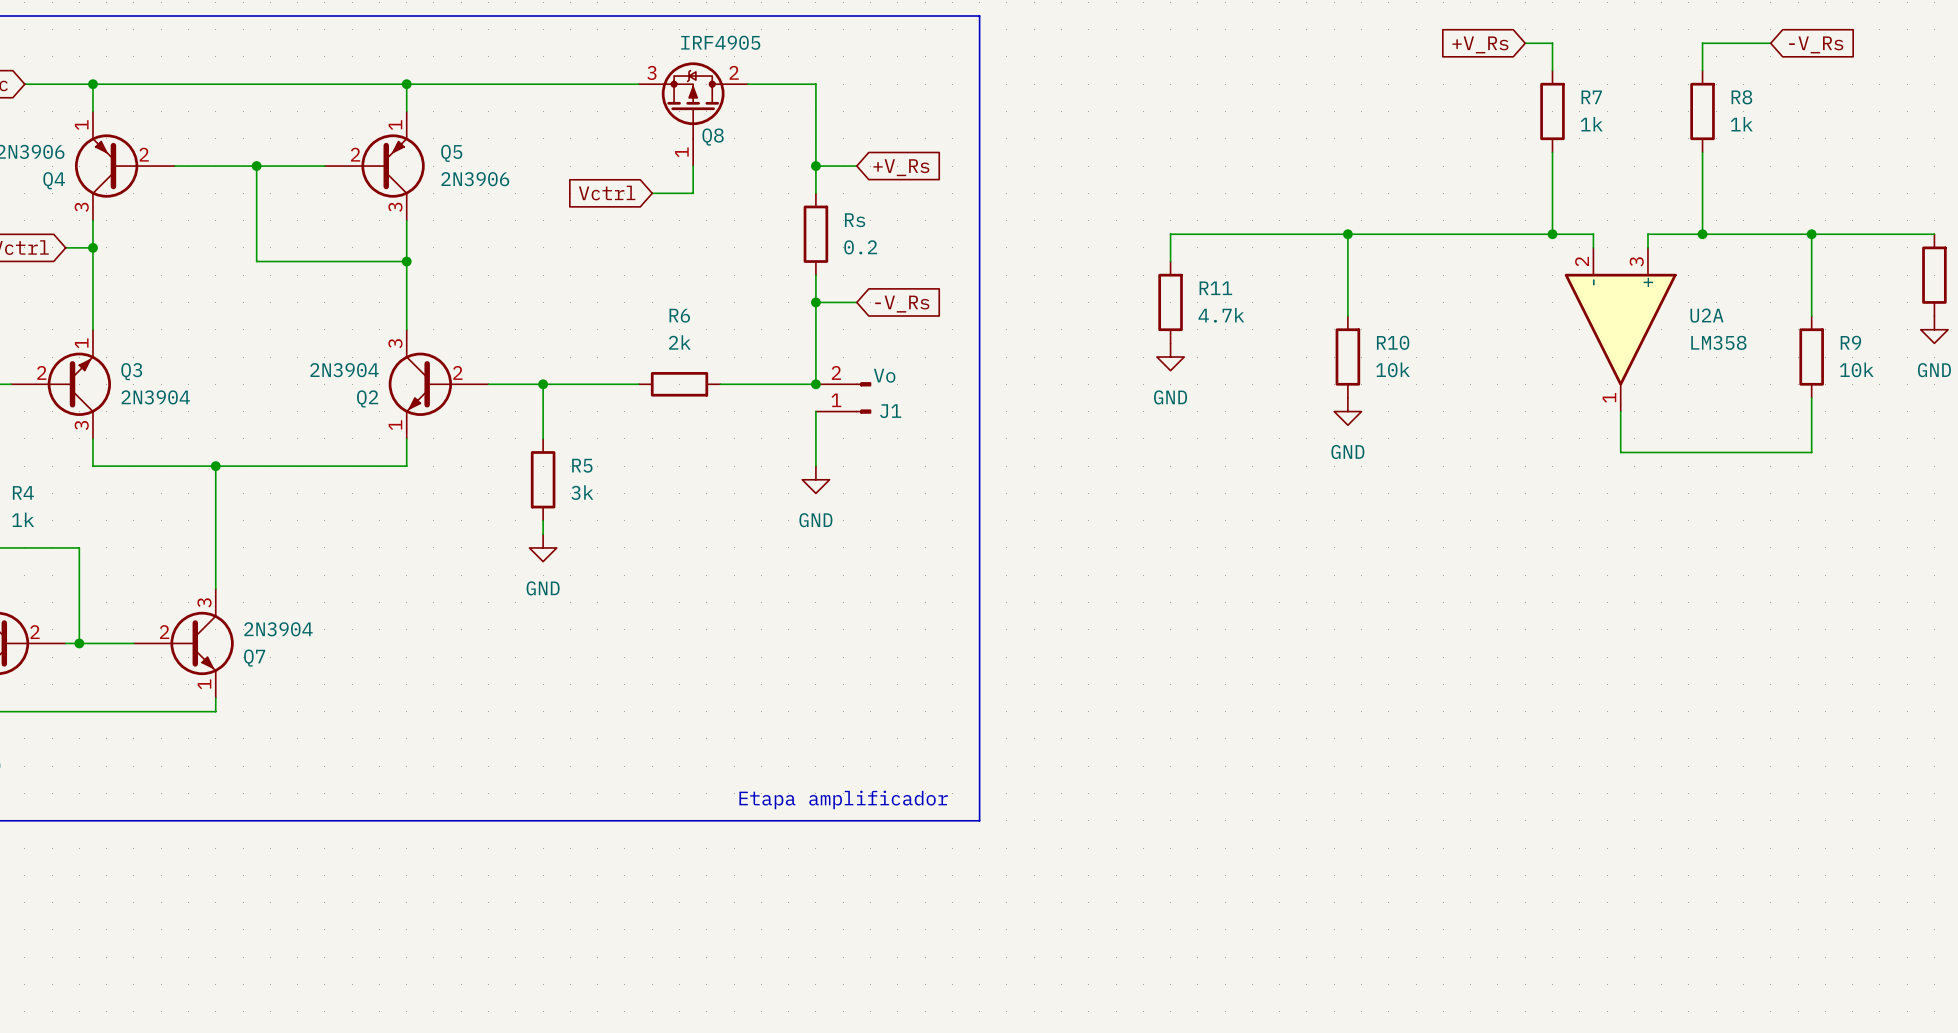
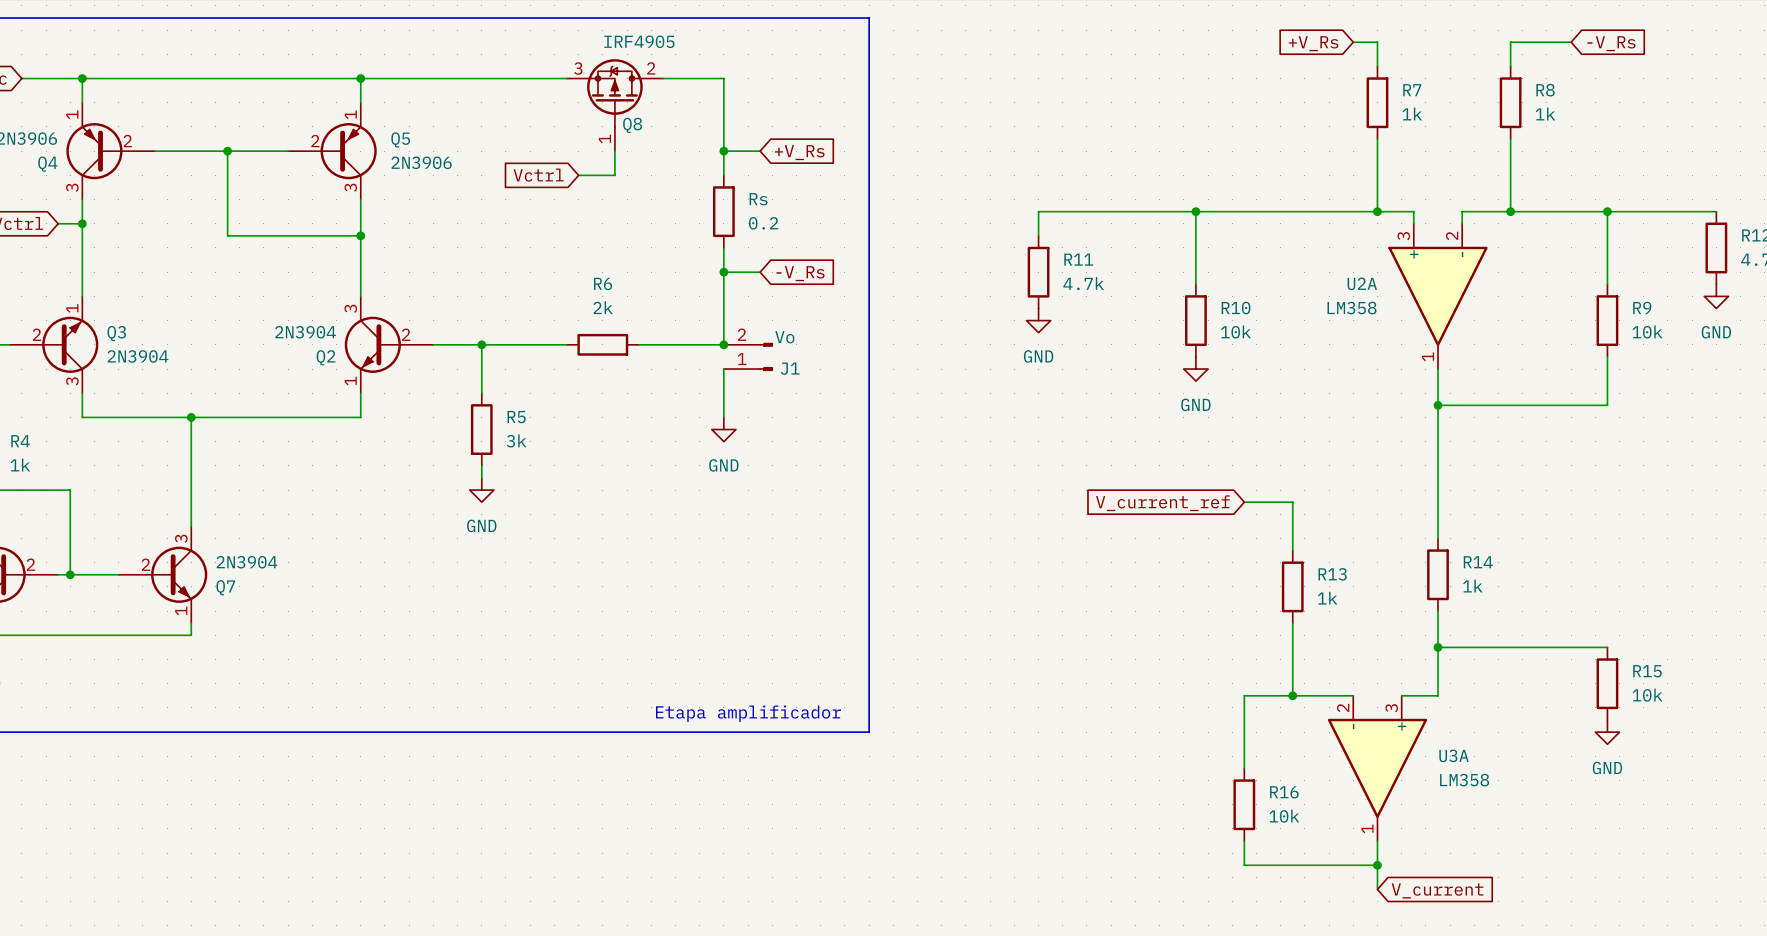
U2A flip: as is (1620, 329) -> left-right (1438, 296)
wire: none -> (1438, 405) (1438, 538)
junction: none -> (1438, 405)
wire: none -> (1244, 502) (1292, 502) (1292, 550)
global label: none -> V_current_ref (1162, 503)
R14: none -> 1k (1438, 574)
R13: none -> 1k (1292, 586)
wire: none -> (1438, 611) (1438, 695) (1401, 695)
wire: none -> (1292, 623) (1292, 695)
wire: none -> (1438, 647) (1607, 647)
junction: none -> (1438, 647)
R15: none -> 10k (1607, 683)
junction: none -> (1292, 695)
wire: none -> (1353, 695) (1244, 695) (1244, 768)
power symbol: none -> GND (1607, 732)
U3A: none -> LM358 (1377, 768)
R16: none -> 10k (1244, 804)
wire: none -> (1244, 841) (1244, 865) (1377, 865)
wire: none -> (1377, 841) (1377, 889)
junction: none -> (1377, 865)
global label: none -> V_current (1437, 890)

